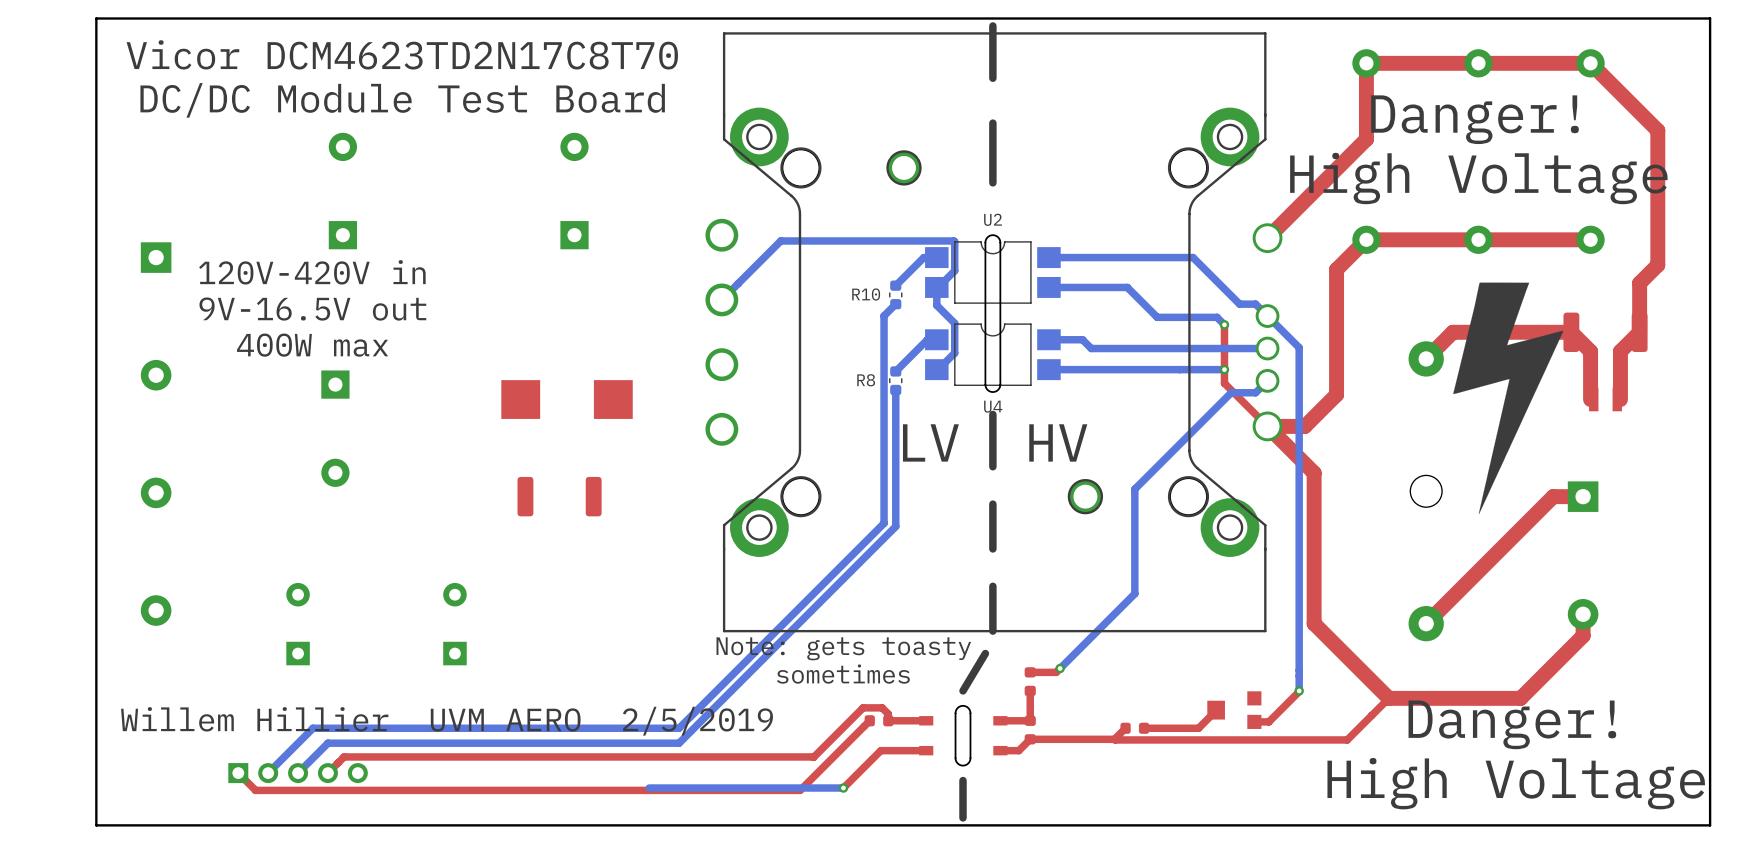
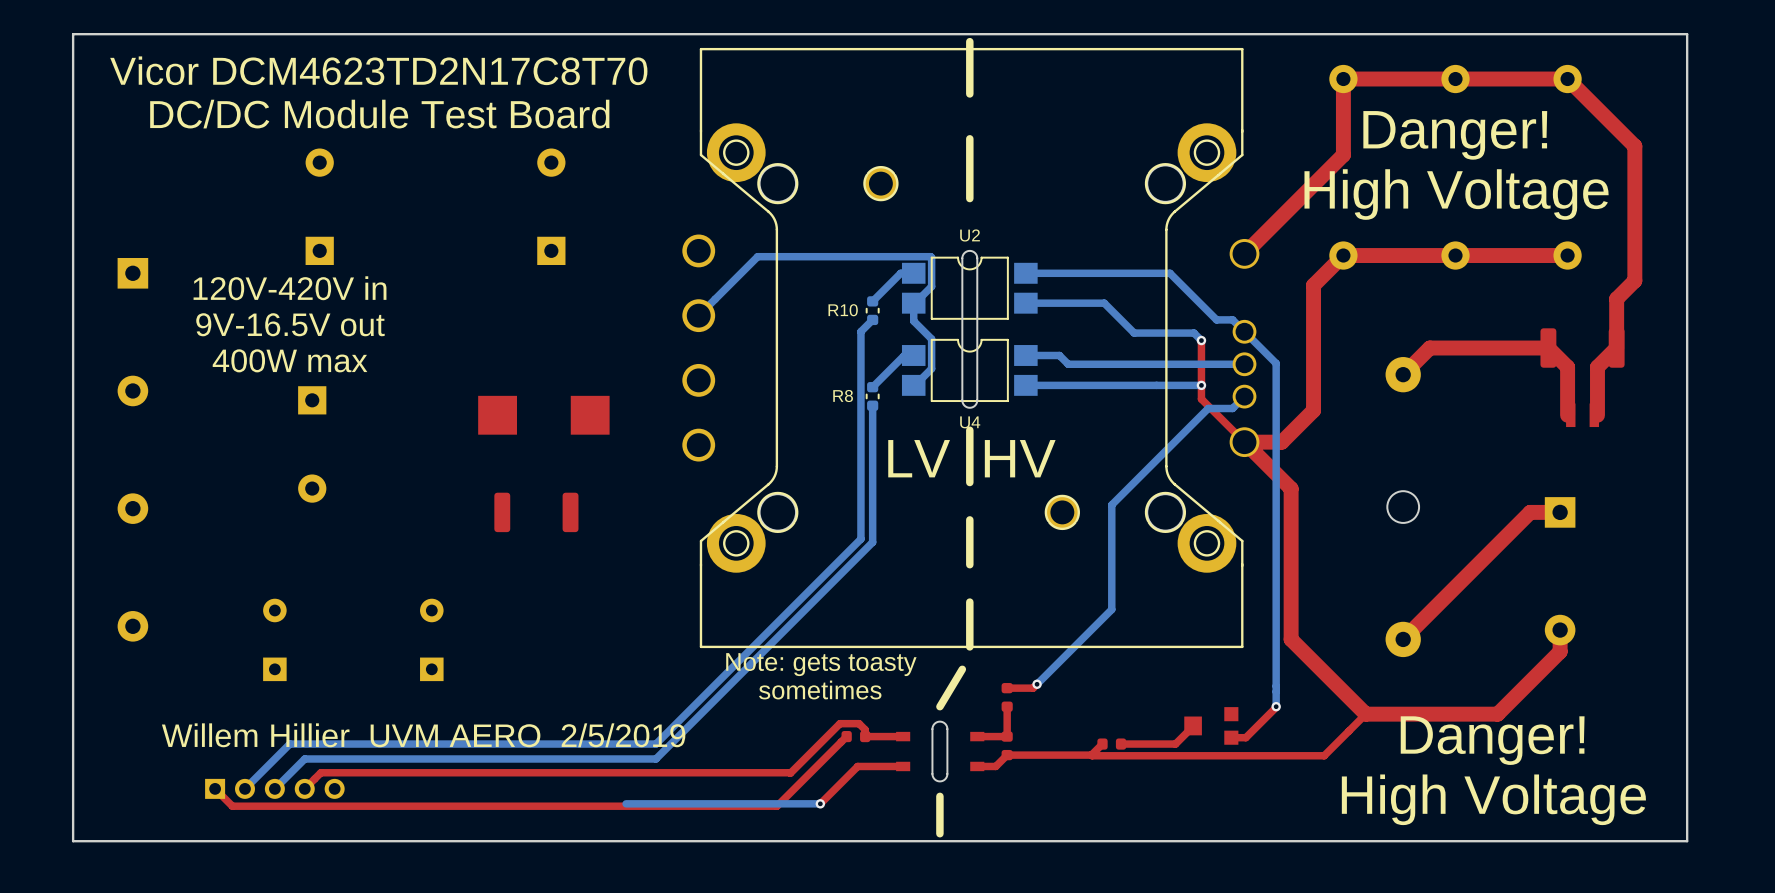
drawing: [1453, 282, 1564, 515] -> none

